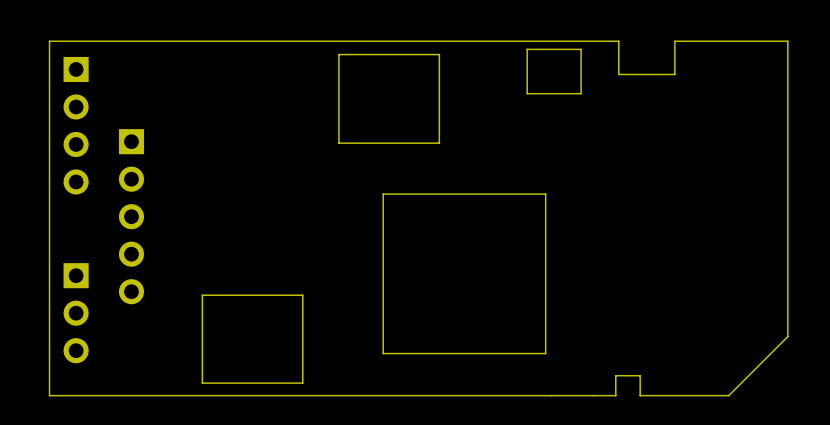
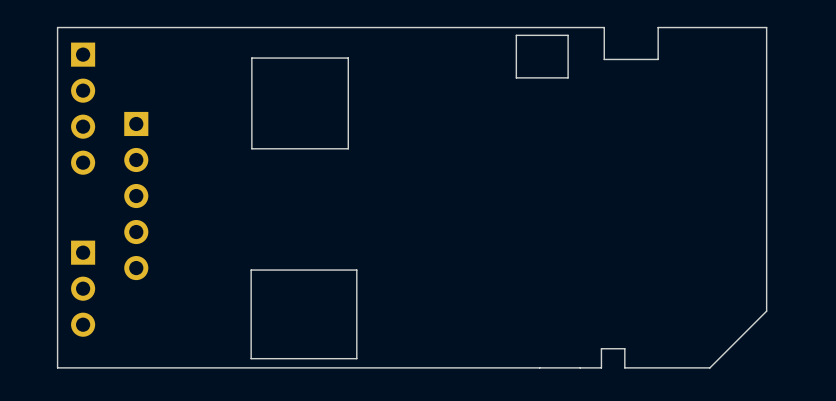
board edge: (439, 54) (338, 54) (338, 143) (439, 143) (439, 54) -> none
board edge: none -> (348, 58) (251, 58) (251, 148) (348, 148) (348, 58)
board edge: (545, 194) (545, 353) (383, 353) (383, 194) (545, 194) -> none
board edge: none -> (356, 270) (356, 358) (251, 358) (251, 270) (356, 270)
board edge: (302, 295) (302, 383) (202, 383) (202, 295) (302, 295) -> none

